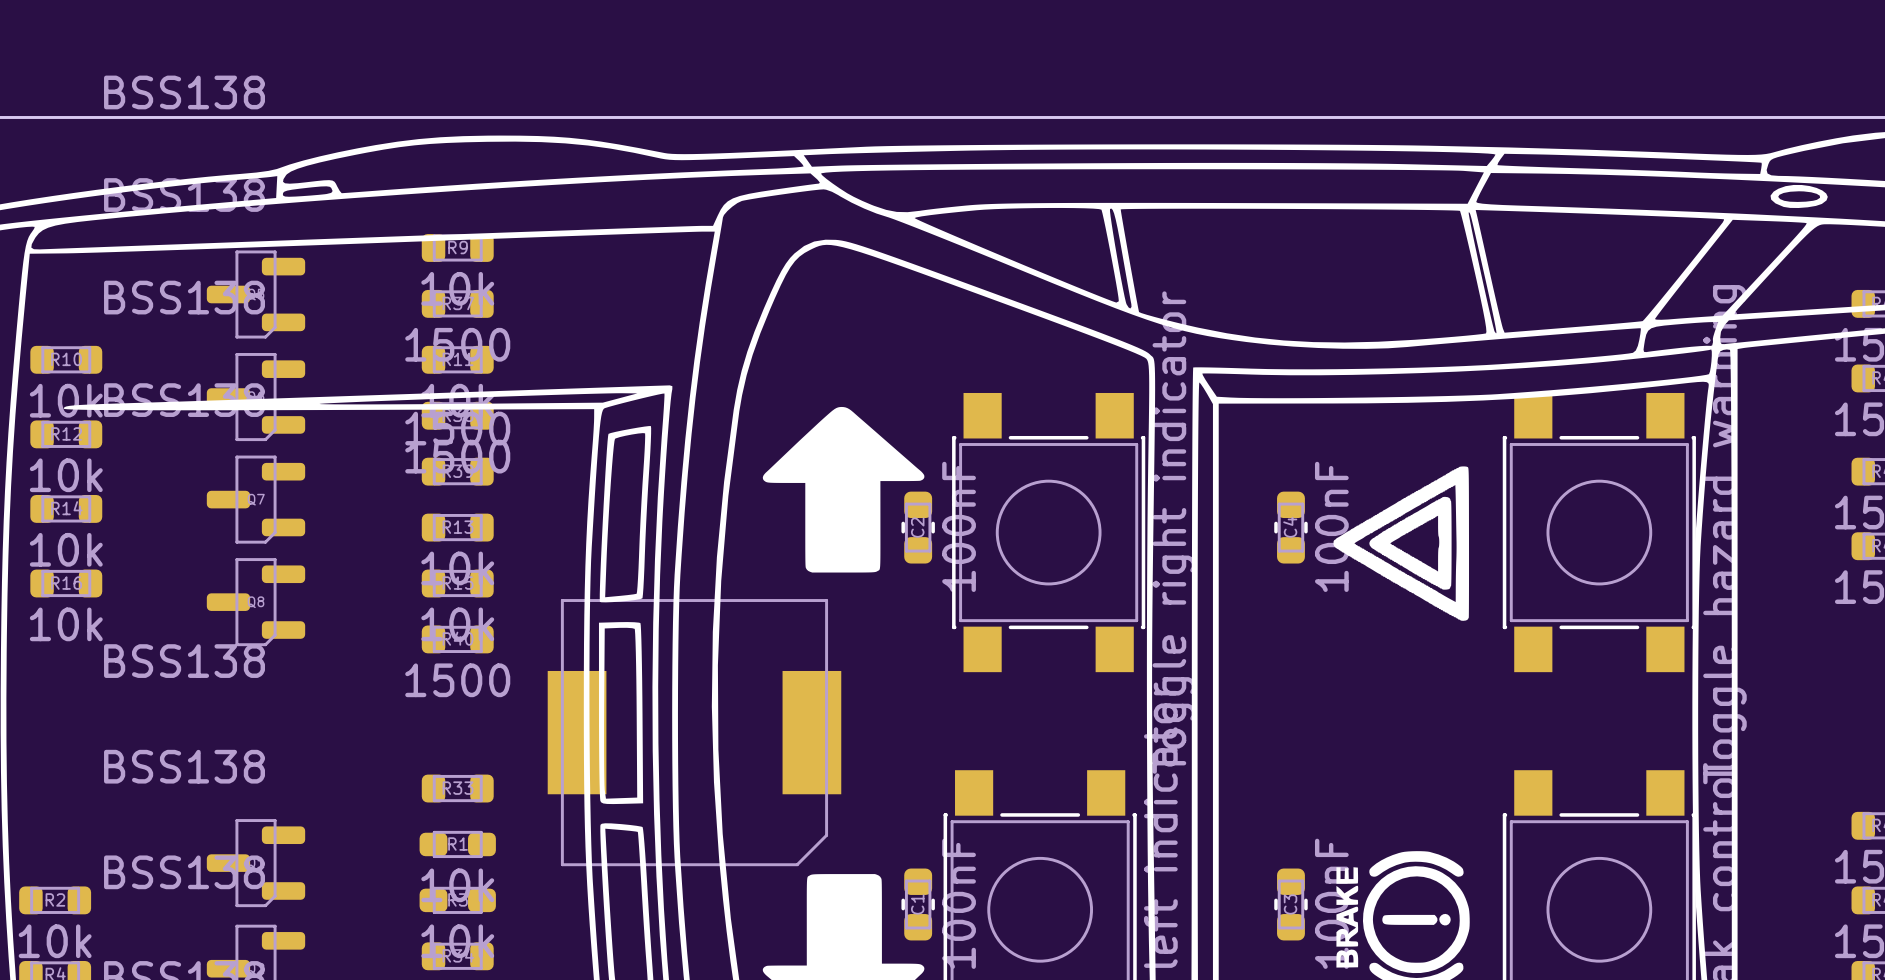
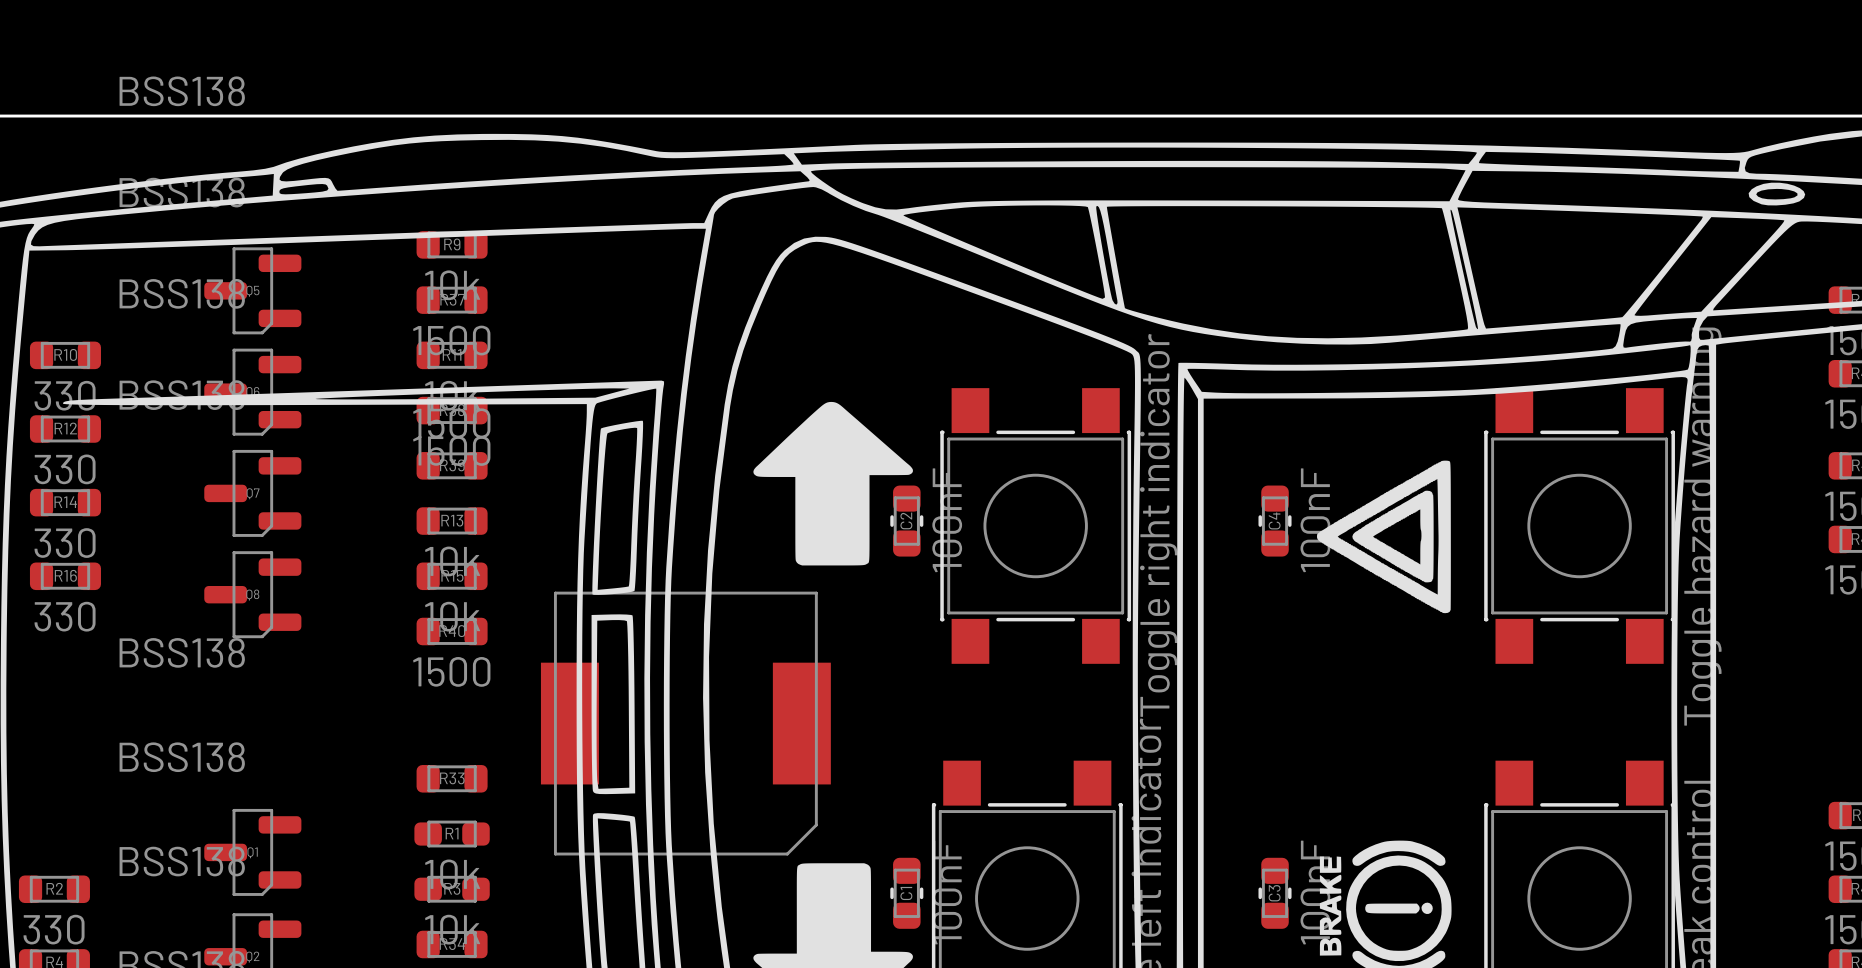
R10 value: 10k (66, 400) -> 330 (65, 395)
R12 value: 10k (66, 475) -> 330 (65, 469)
R14 value: 10k (66, 549) -> 330 (65, 543)
R16 value: 10k (66, 624) -> 330 (65, 616)
R2 value: 10k (55, 941) -> 330 (54, 929)

